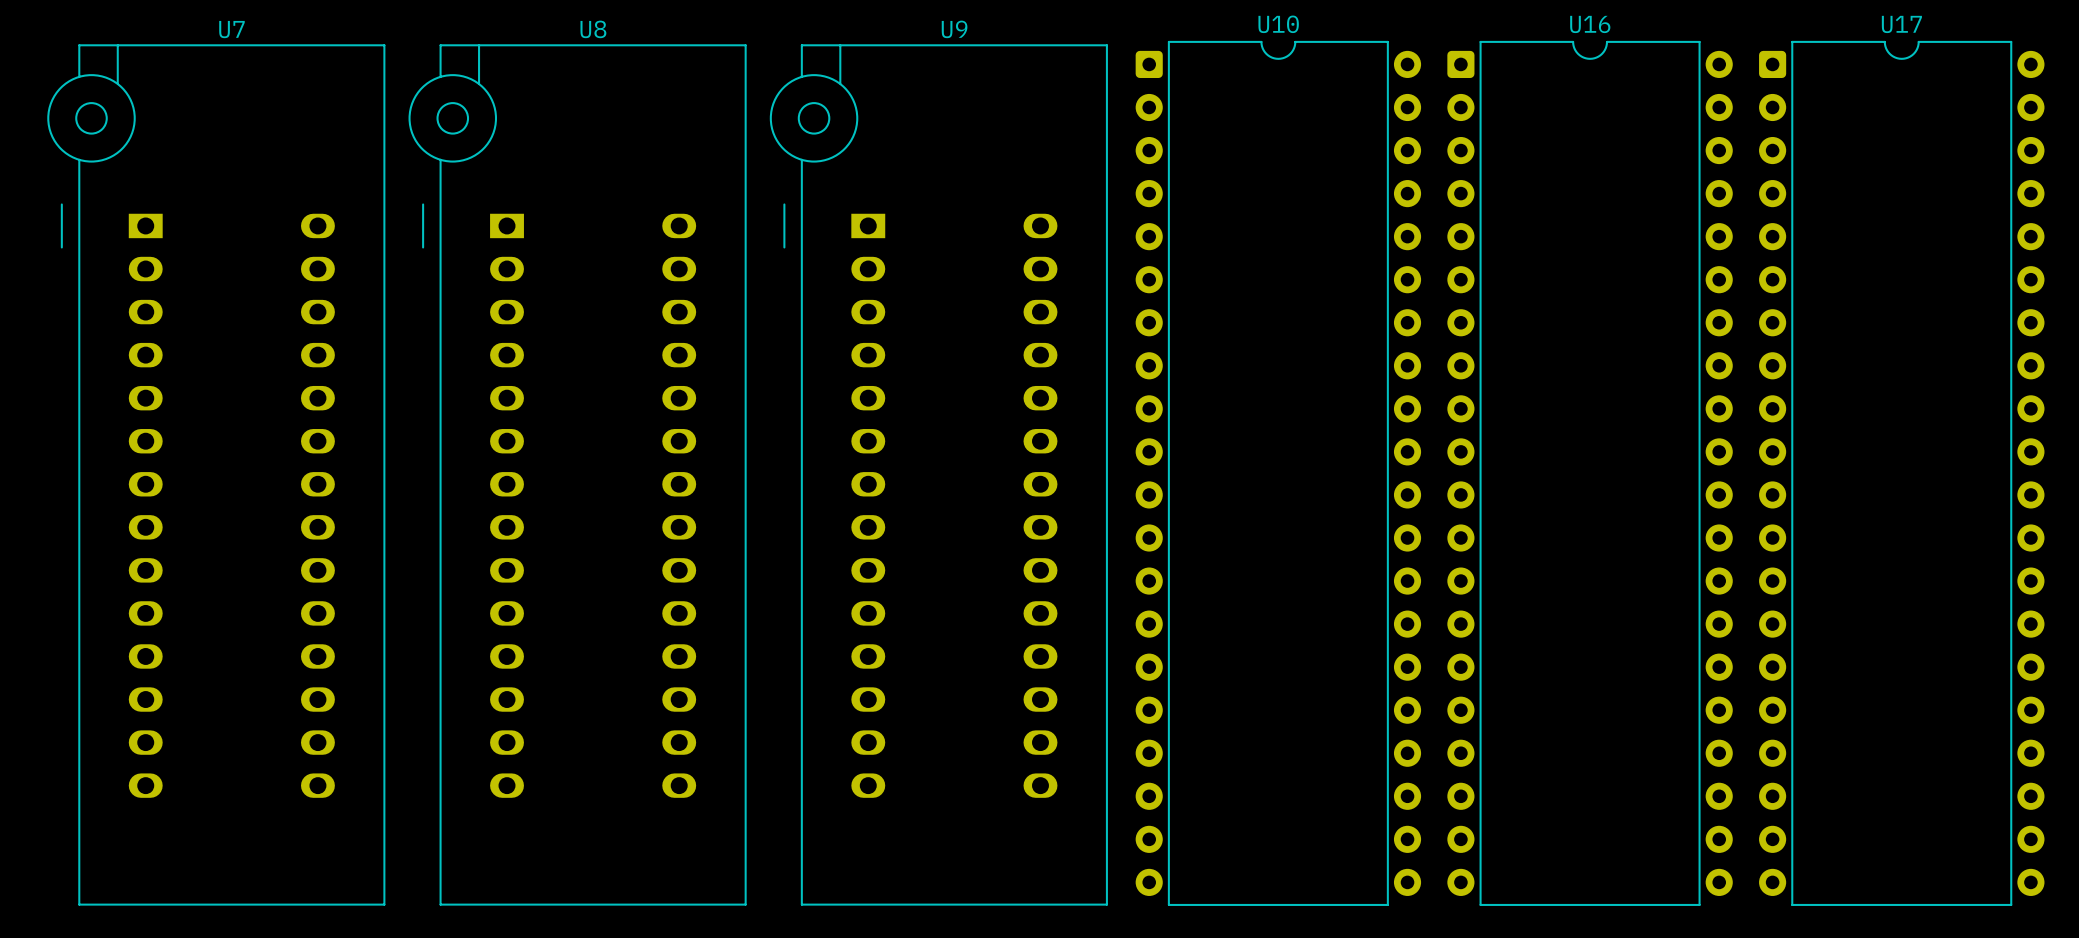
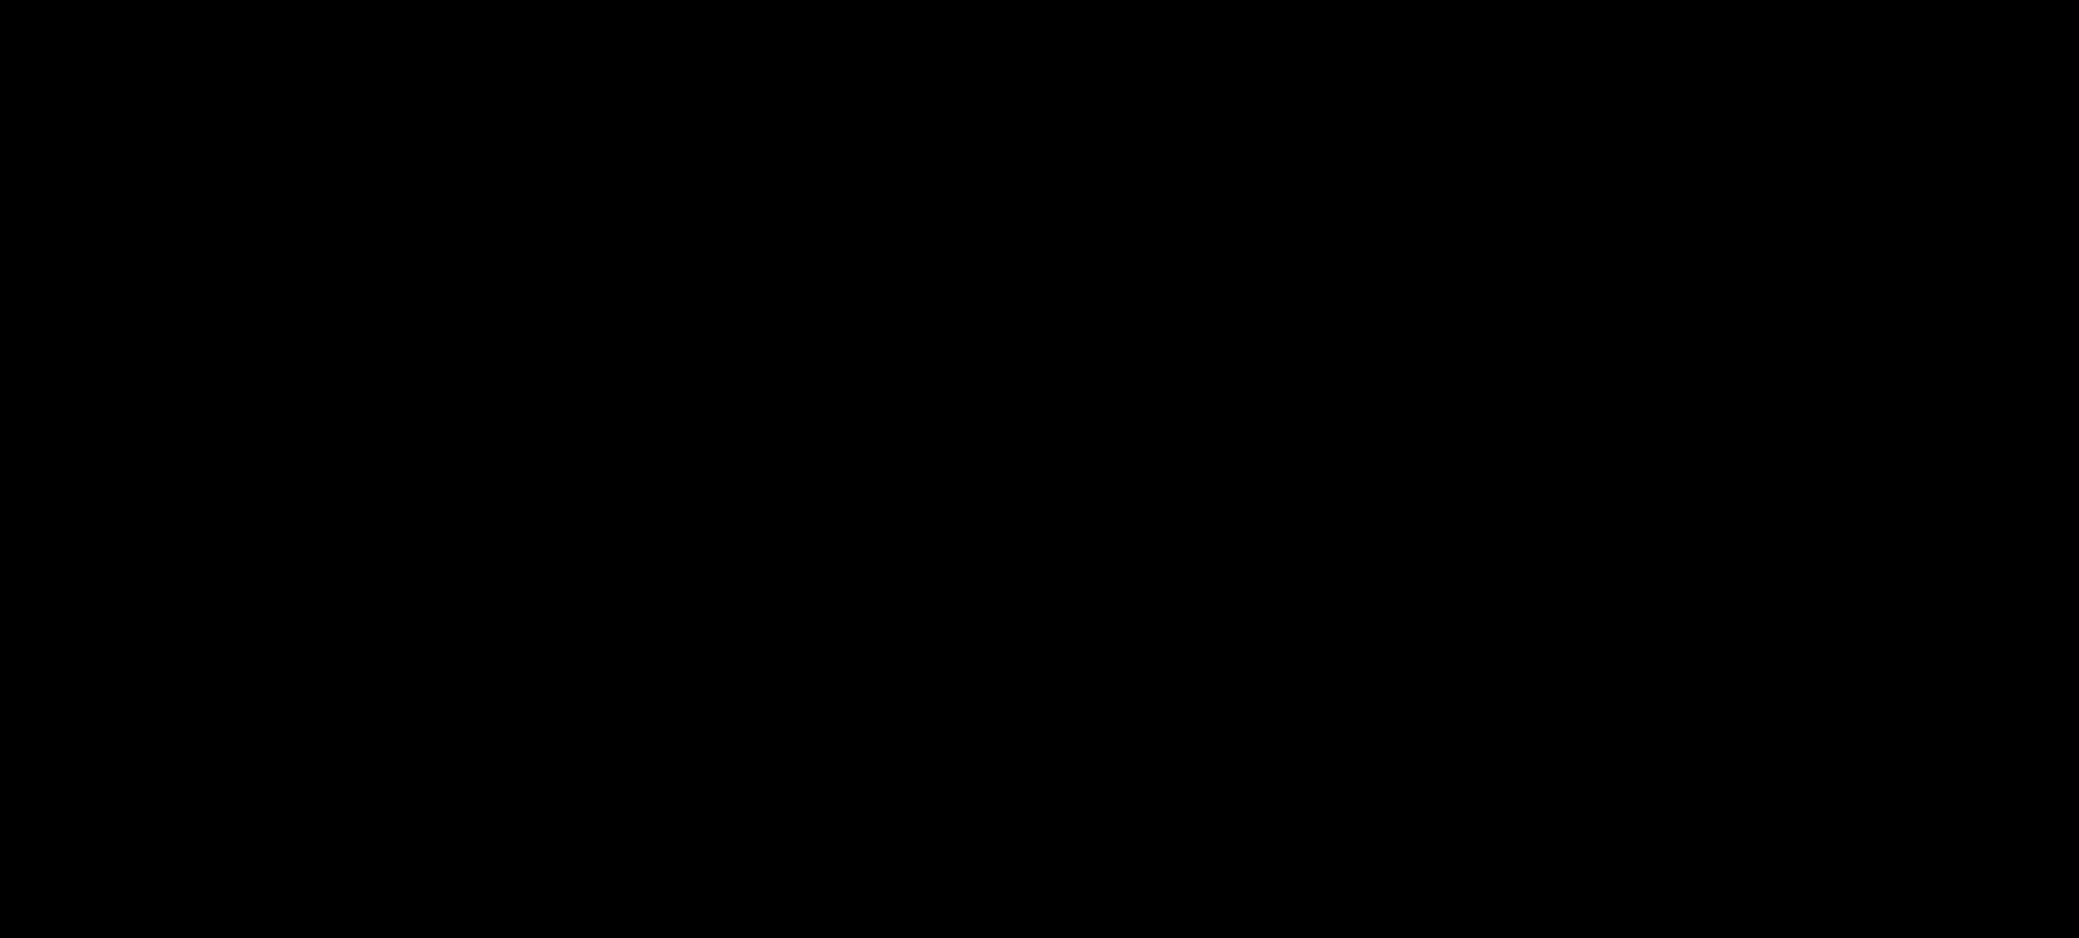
U10: (1278, 473) -> none
U16: (1590, 473) -> none
U17: (1901, 473) -> none
U7: (216, 474) -> none
U8: (577, 474) -> none
U9: (938, 474) -> none

